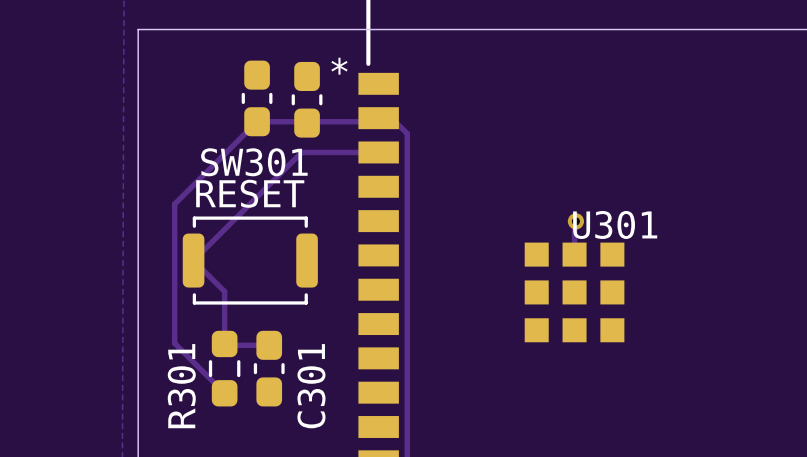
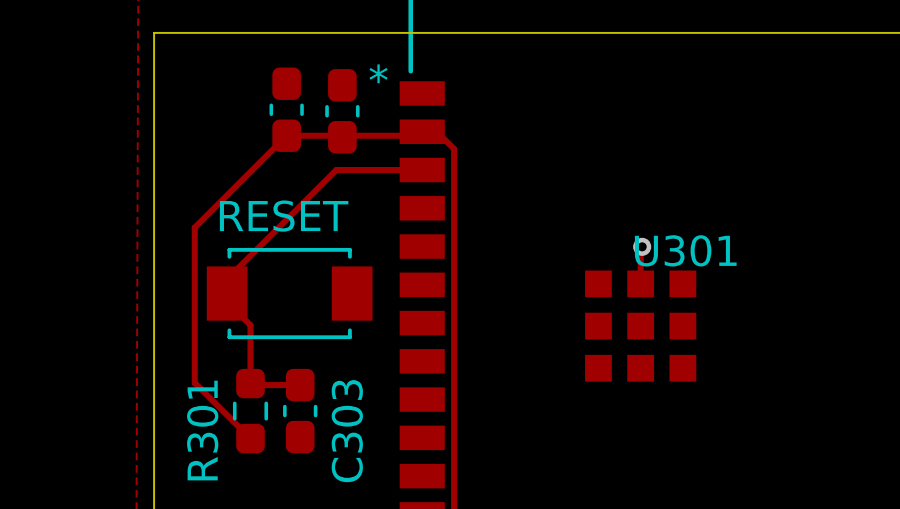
SW301: (250, 260) -> none
part: none -> (289, 293)
C301 name: C301 (311, 386) -> C303 (347, 431)

